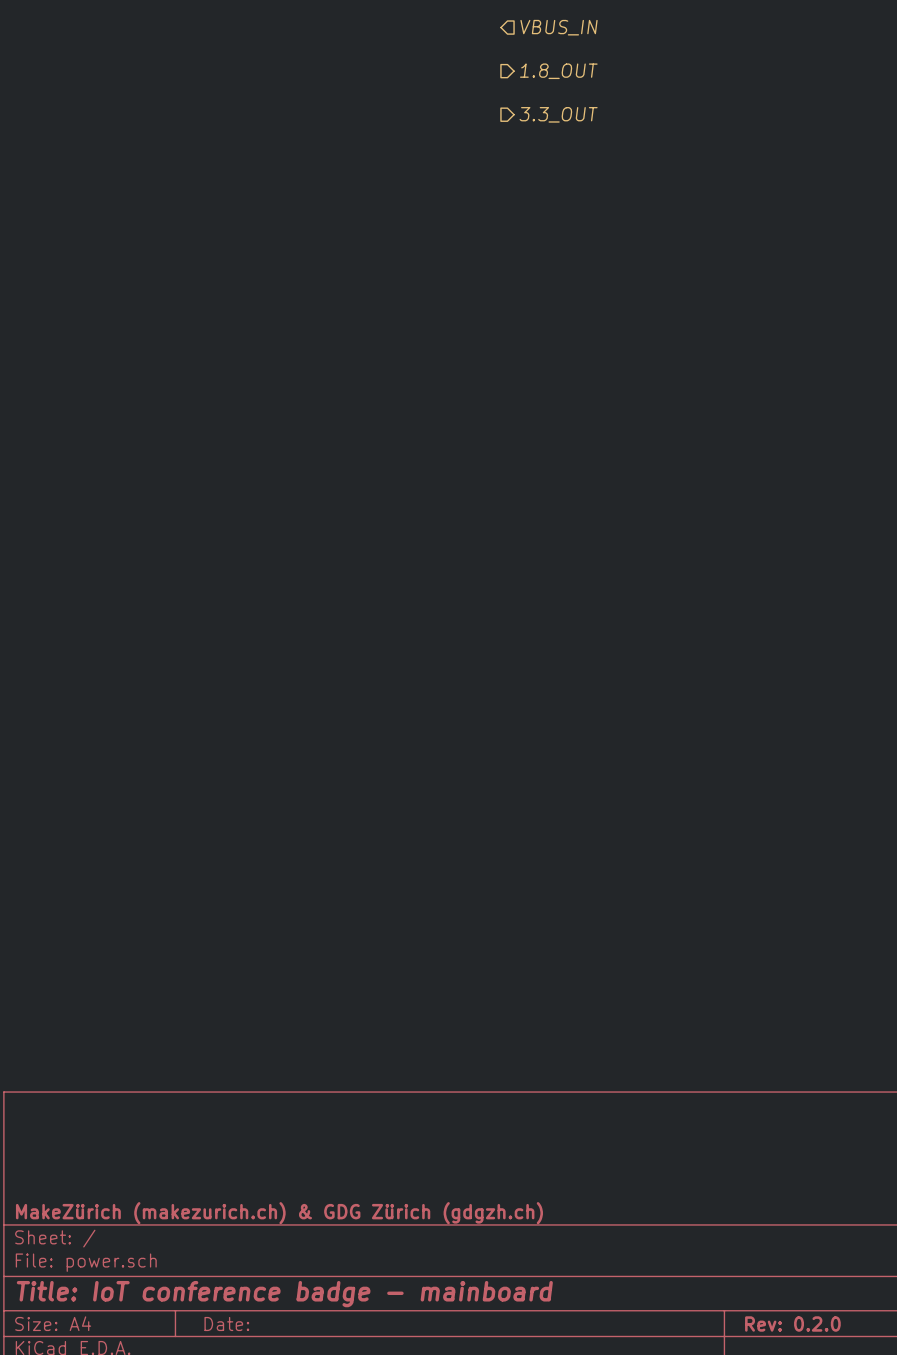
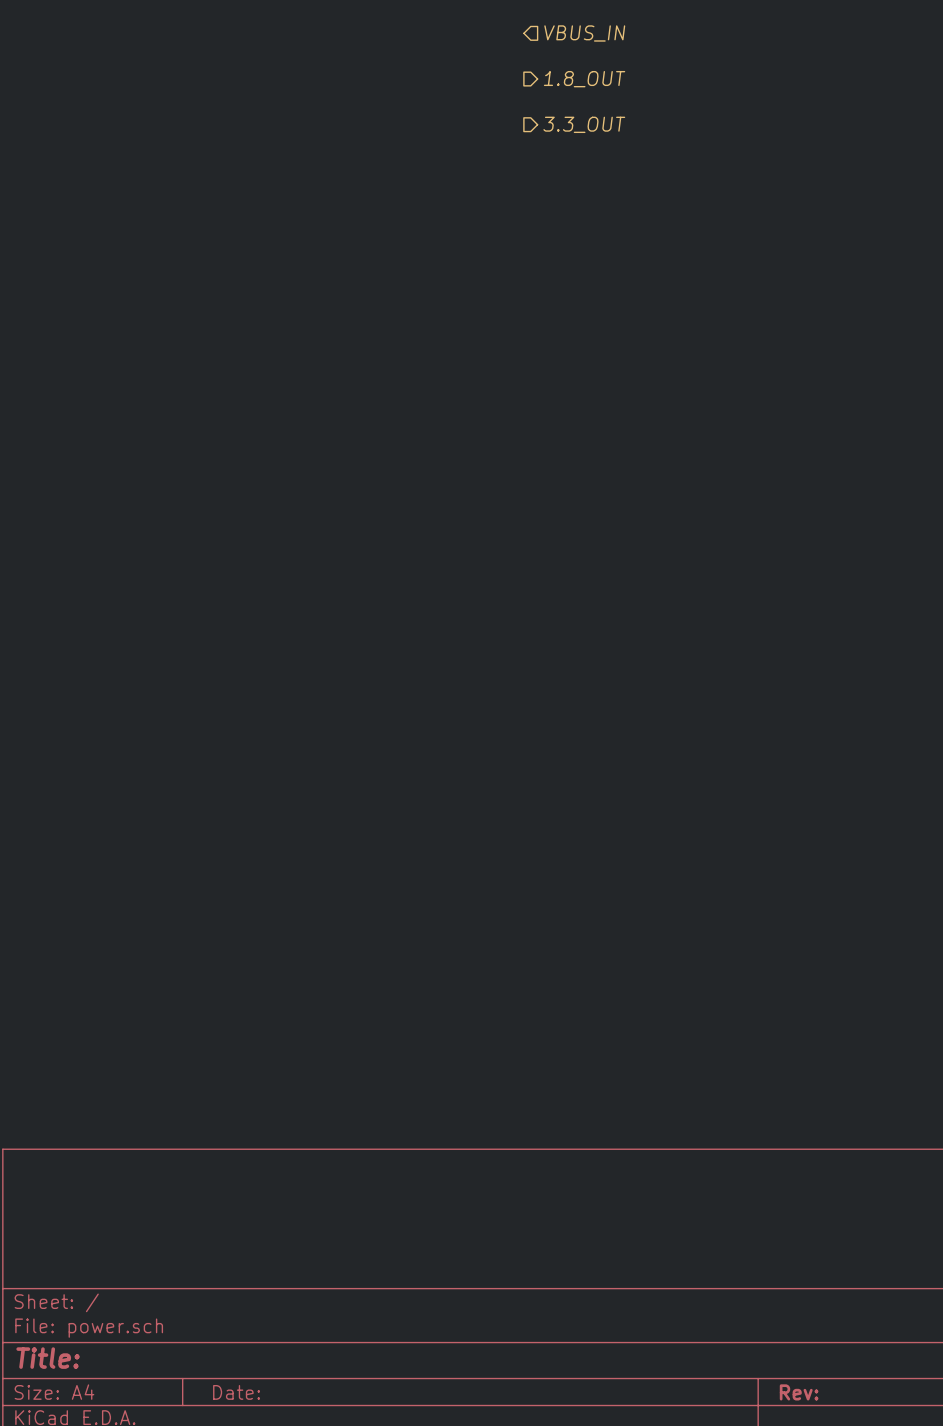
title block: MakeZürich (makezurich.ch) & GDG Zürich (gdgzh.ch) (279, 1213) -> none
title block: Title: IoT conference badge - mainboard (284, 1294) -> Title: (48, 1358)
title block: Rev: 0.2.0 (792, 1324) -> Rev: (799, 1392)

